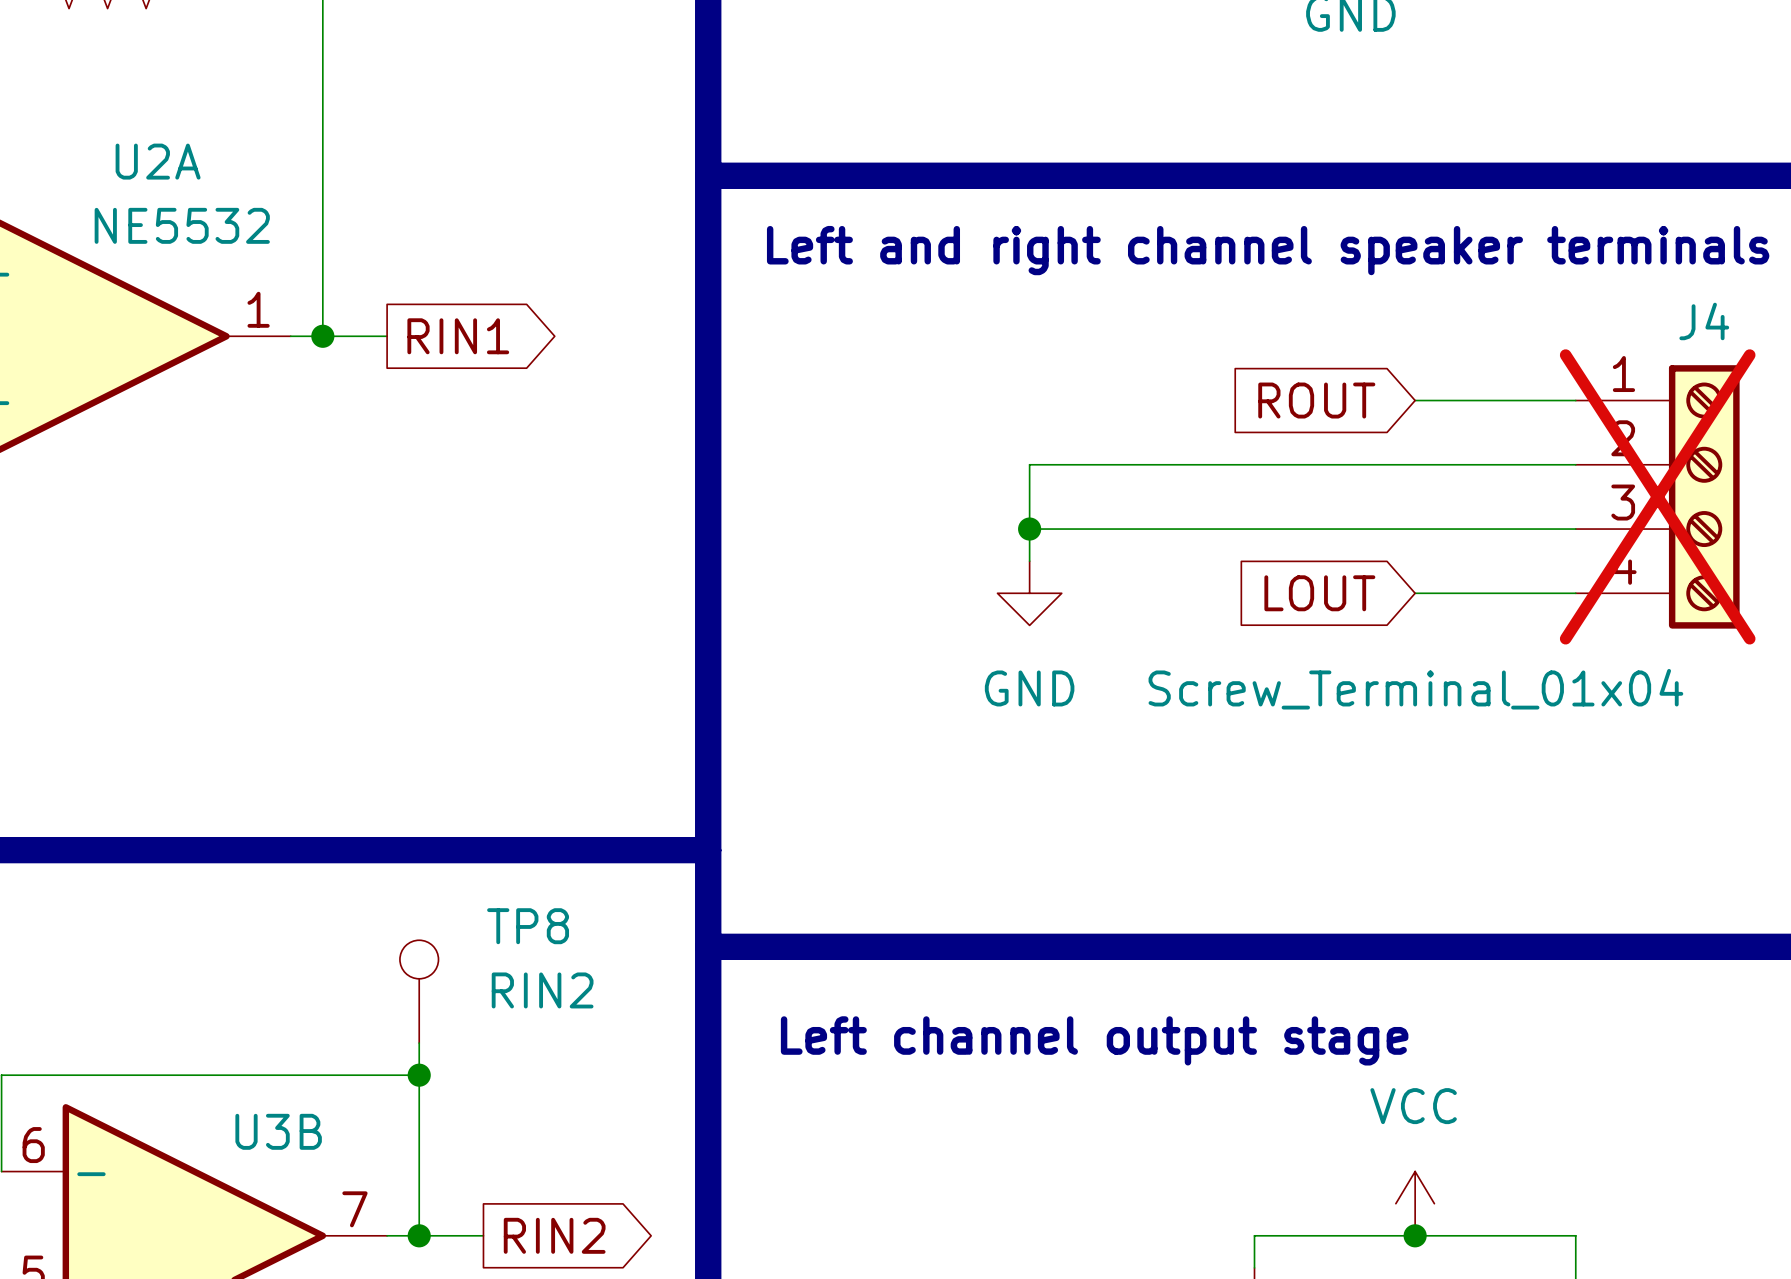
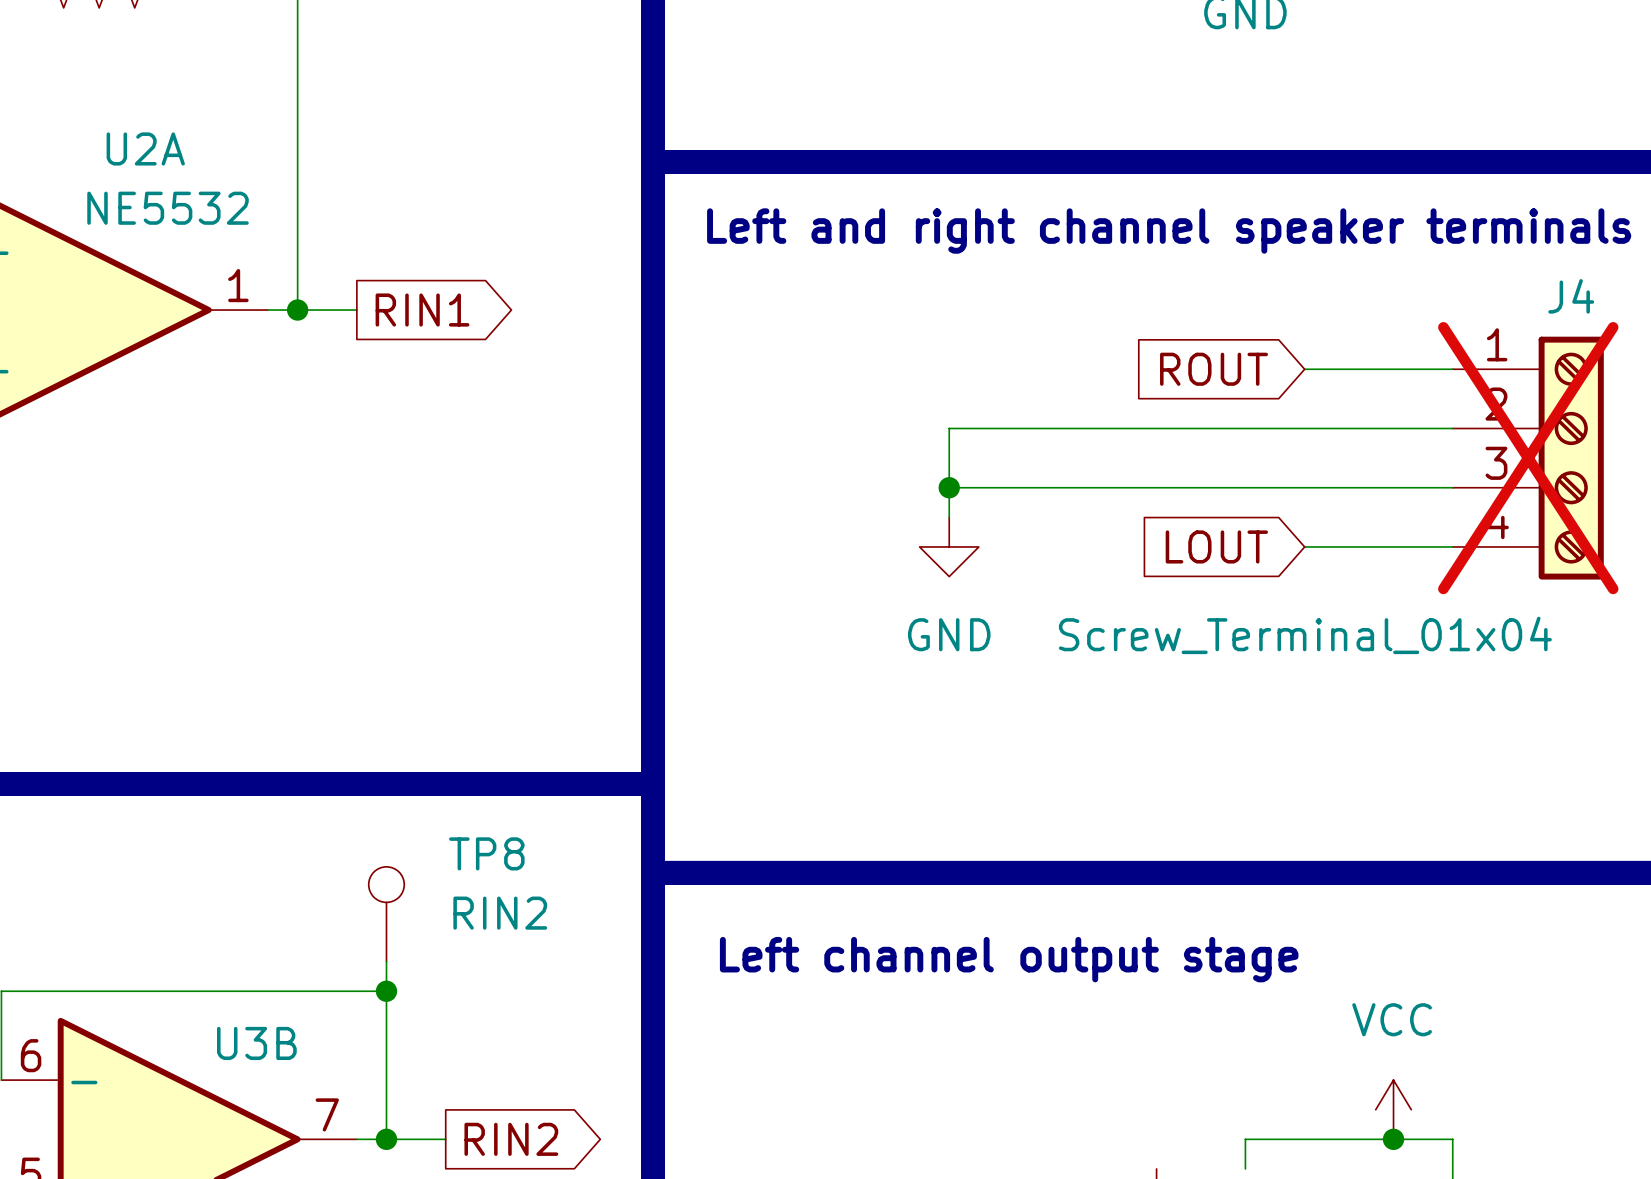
power symbol position: VCC (1415, 1203) -> VCC (1393, 1109)
wire: (1350, 1235) (1254, 1235) (1254, 1267) -> (1245, 1139) (1245, 1168)
junction position: (1415, 1235) -> (1393, 1139)

